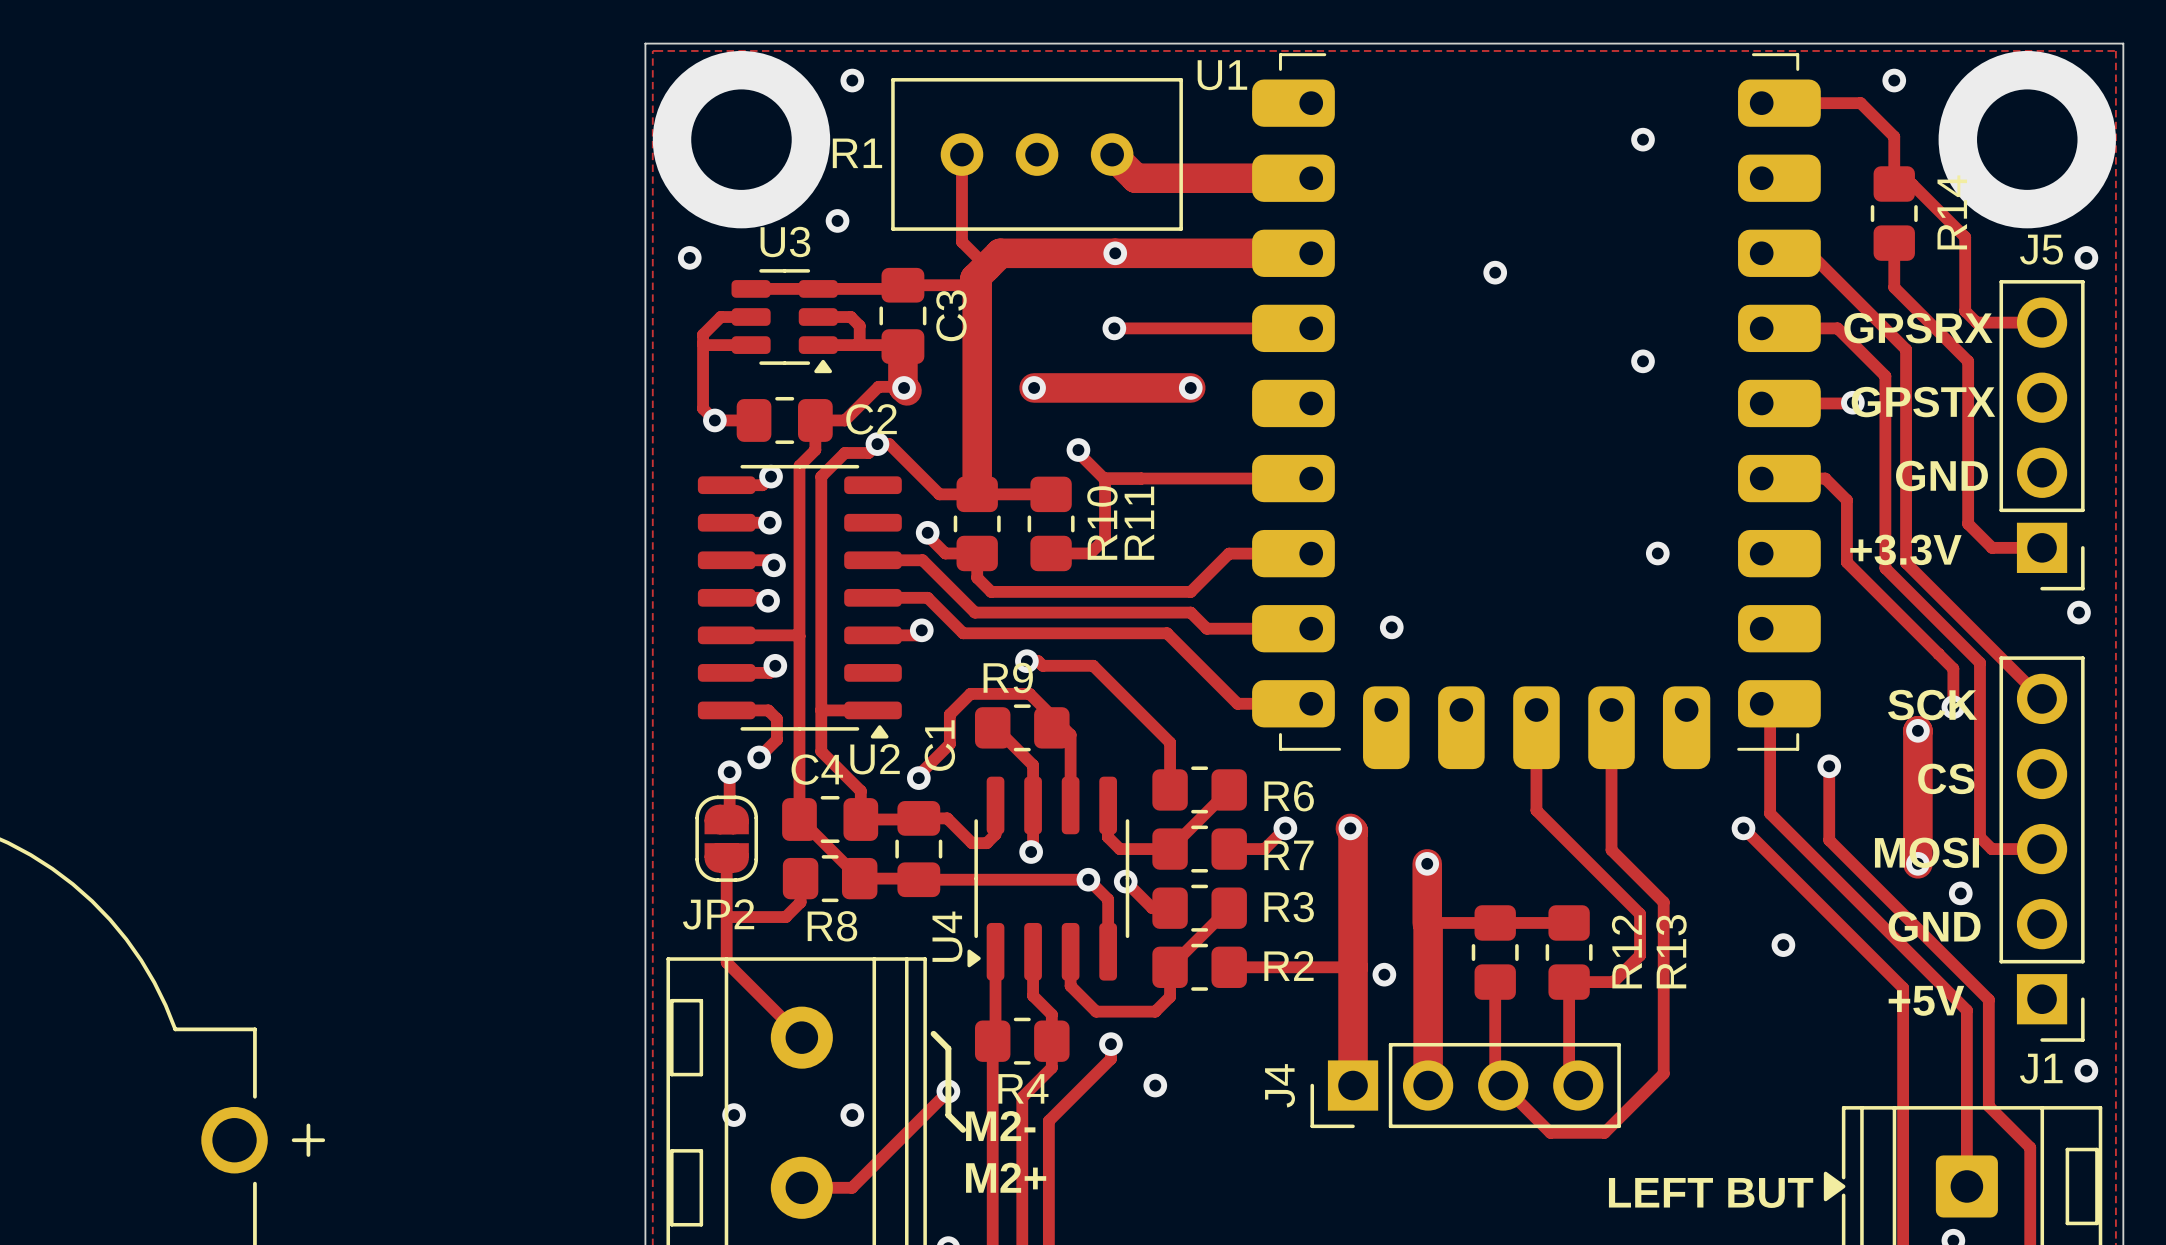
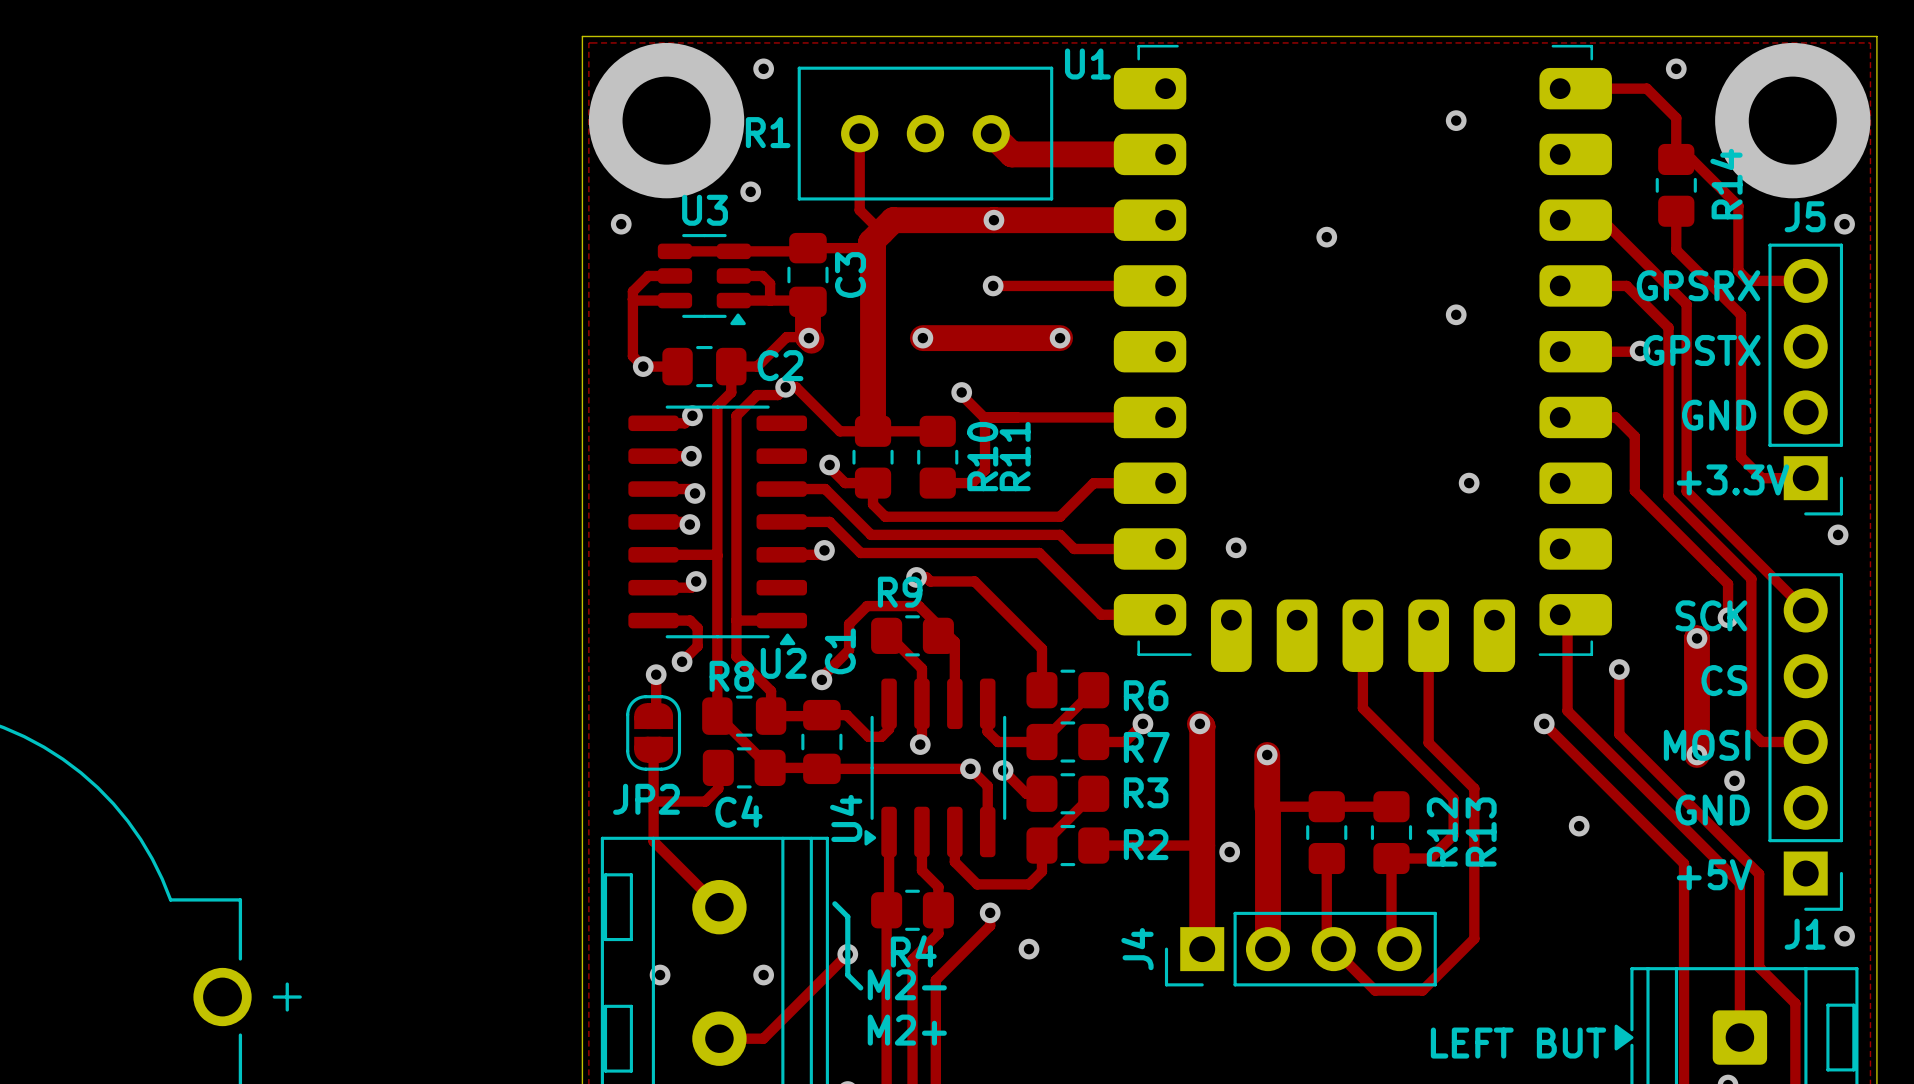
text position: +3.3V (1905, 549) -> +3.3V (1733, 479)
C4 name position: C4 (817, 769) -> C4 (738, 811)
R8 name position: R8 (832, 926) -> R8 (731, 676)

